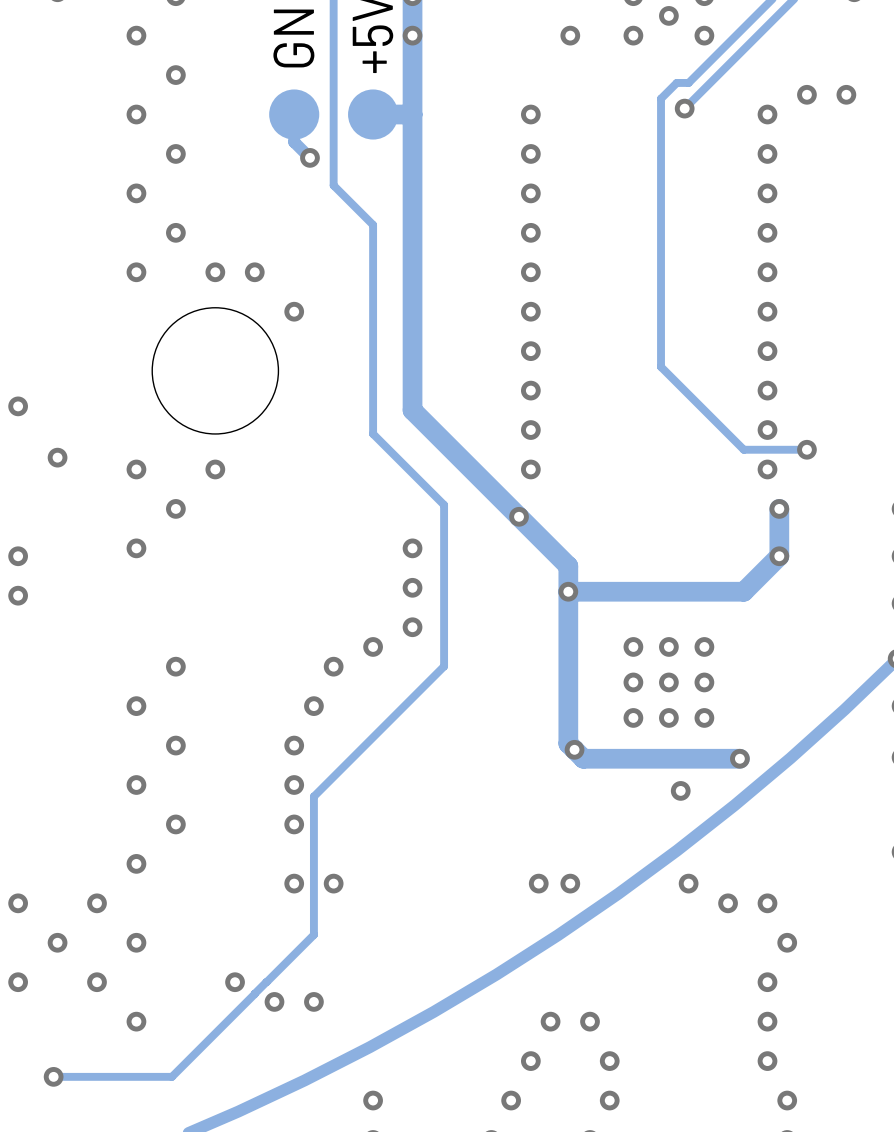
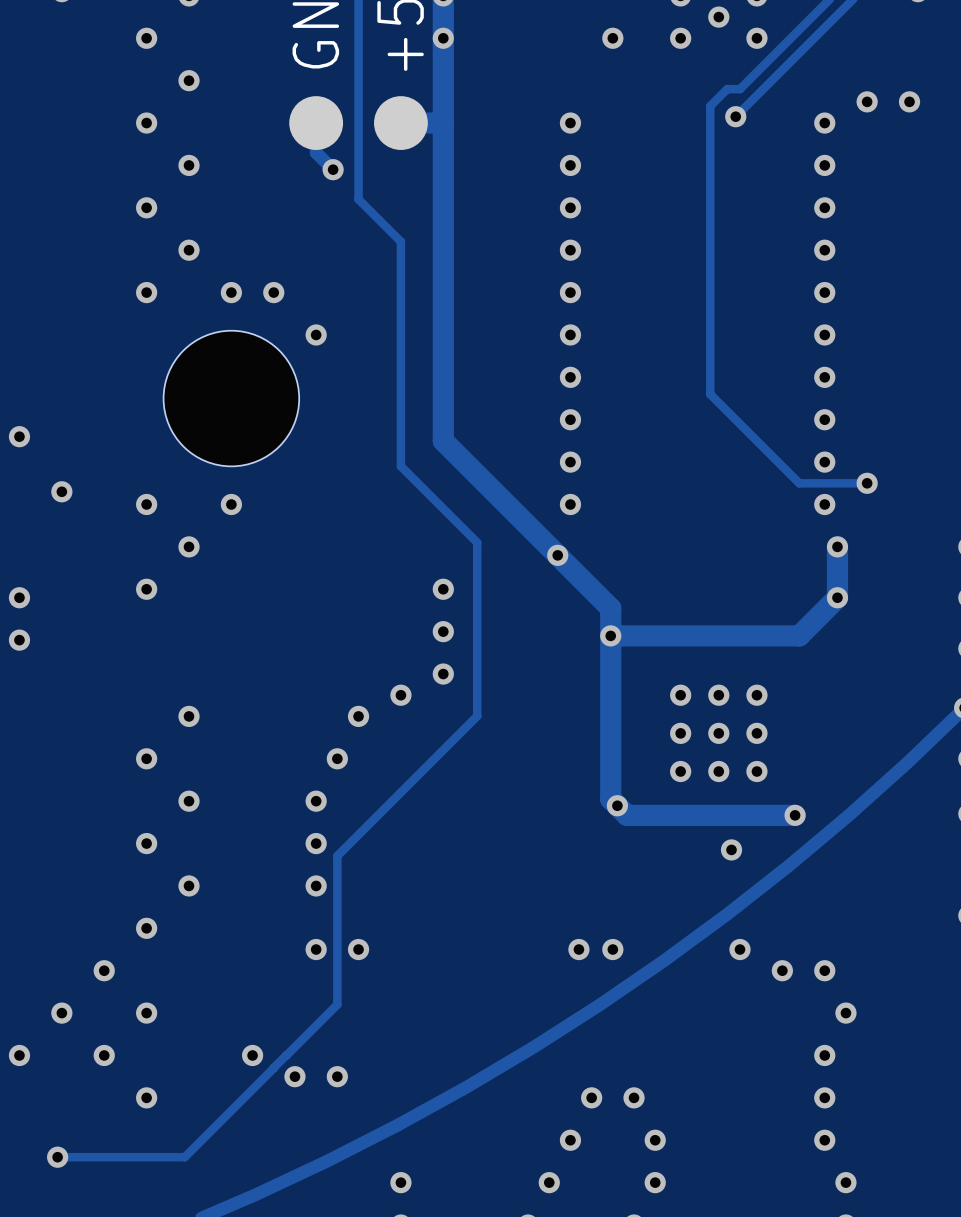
via: (18, 903) -> none

